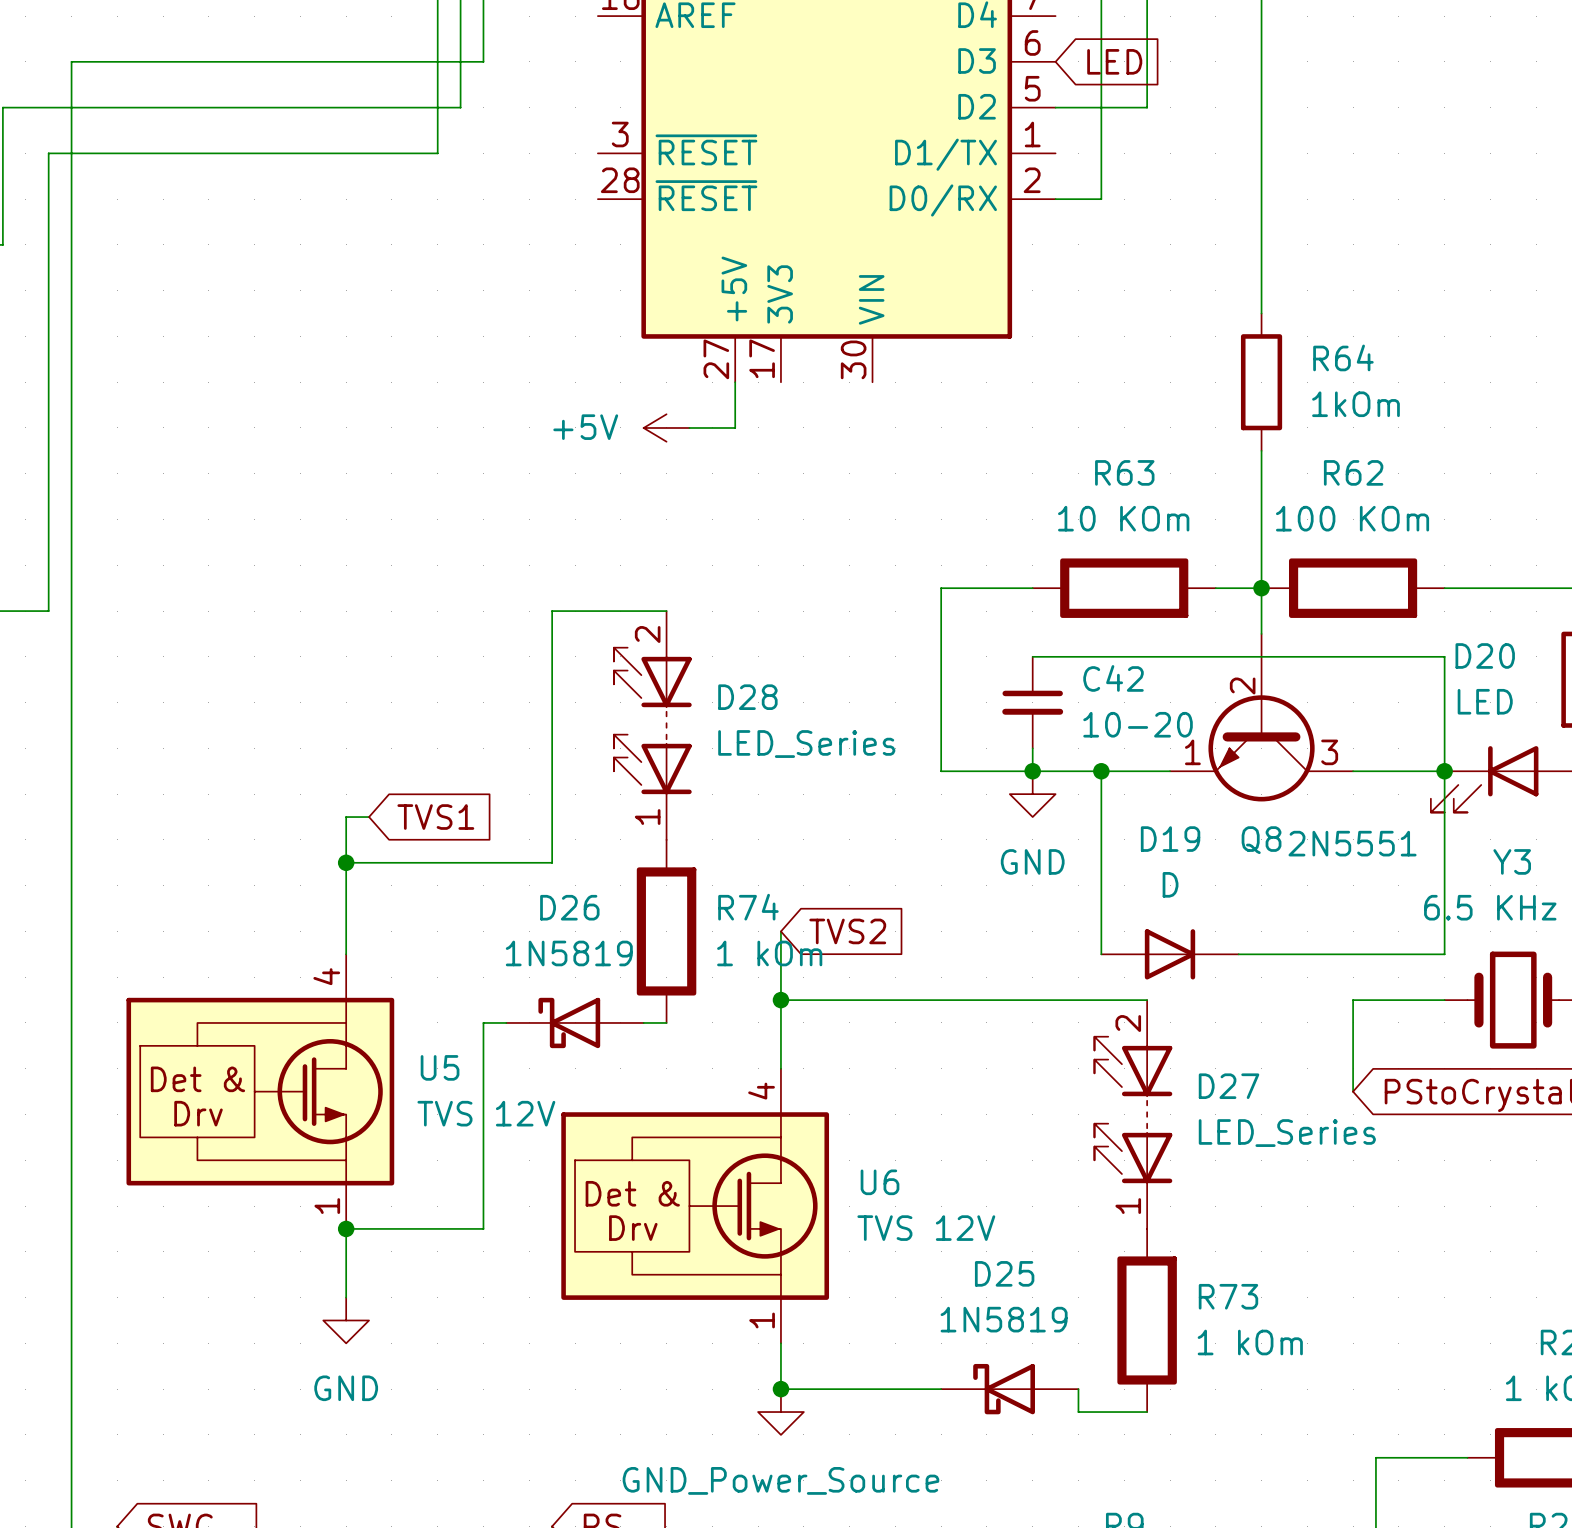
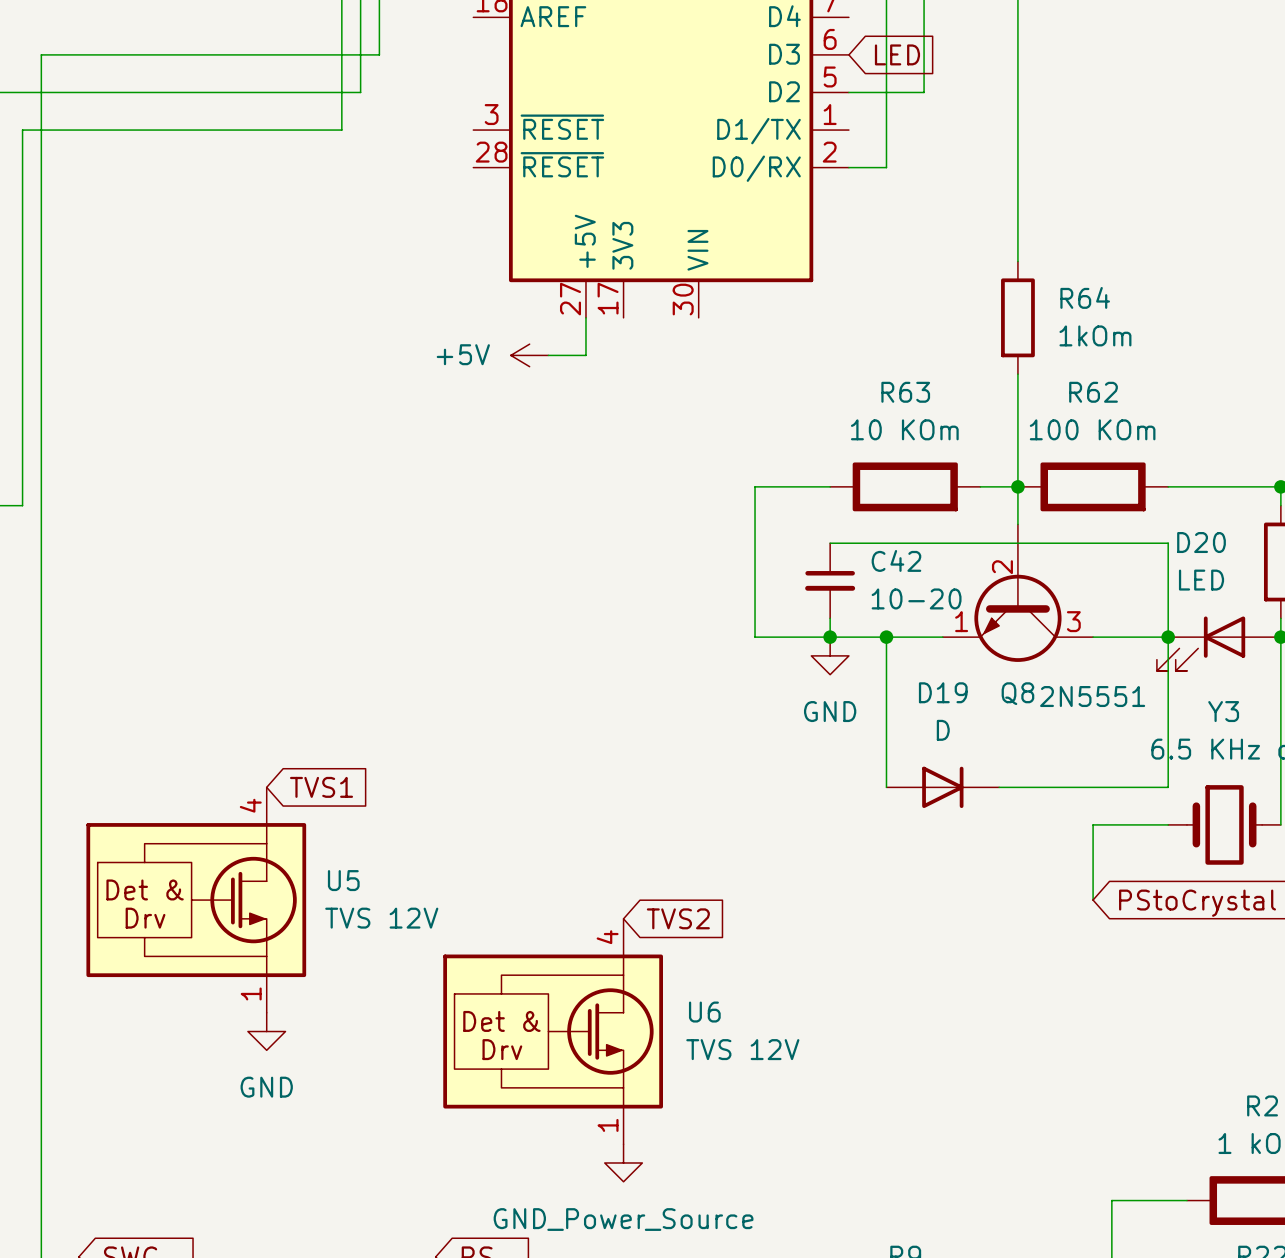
wire: (666, 611) (552, 611) (552, 862) (346, 862) -> none
D28: LED_Series (652, 725) -> none
wire: (369, 817) (346, 817) (346, 954) -> none
global label position: TVS1 (435, 817) -> TVS1 (321, 787)
junction: (346, 862) -> none
R74: 1 kOm (666, 931) -> none
wire: (780, 931) (780, 1068) -> none
global label position: TVS2 (847, 931) -> TVS2 (678, 918)
wire: (780, 1000) (1147, 1000) -> none
junction: (780, 1000) -> none
wire: (506, 1022) (483, 1022) (483, 1228) (346, 1228) (346, 1297) -> none
D26: 1N5819 (575, 1022) -> none
wire: (643, 1022) (666, 1022) -> none
D27: LED_Series (1133, 1114) -> none
U6 position: (695, 1206) -> (553, 1031)
junction: (346, 1228) -> none
power symbol position: GND (346, 1320) -> GND (266, 1031)
R73: 1 kOm (1147, 1320) -> none
wire: (780, 1343) (780, 1389) (941, 1389) -> none
junction: (780, 1389) -> none
D25: 1N5819 (1009, 1389) -> none
wire: (1078, 1389) (1078, 1412) (1147, 1412) -> none

